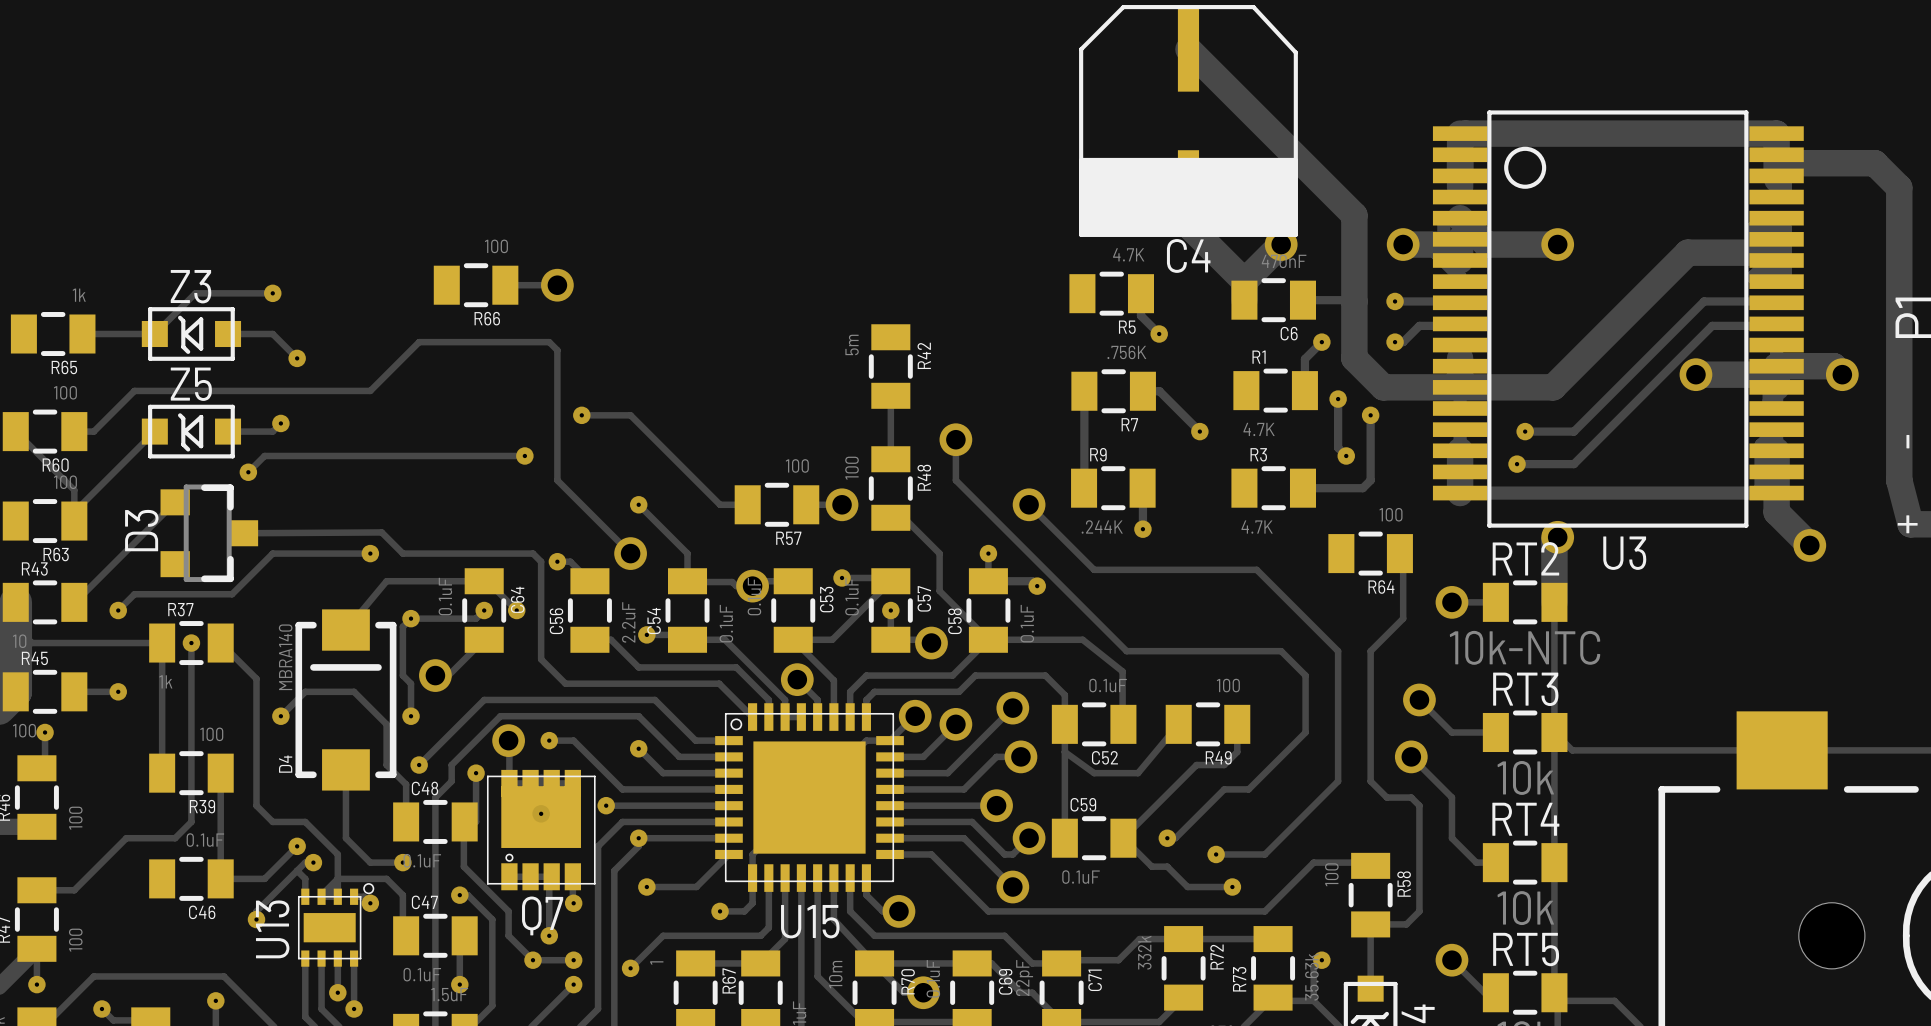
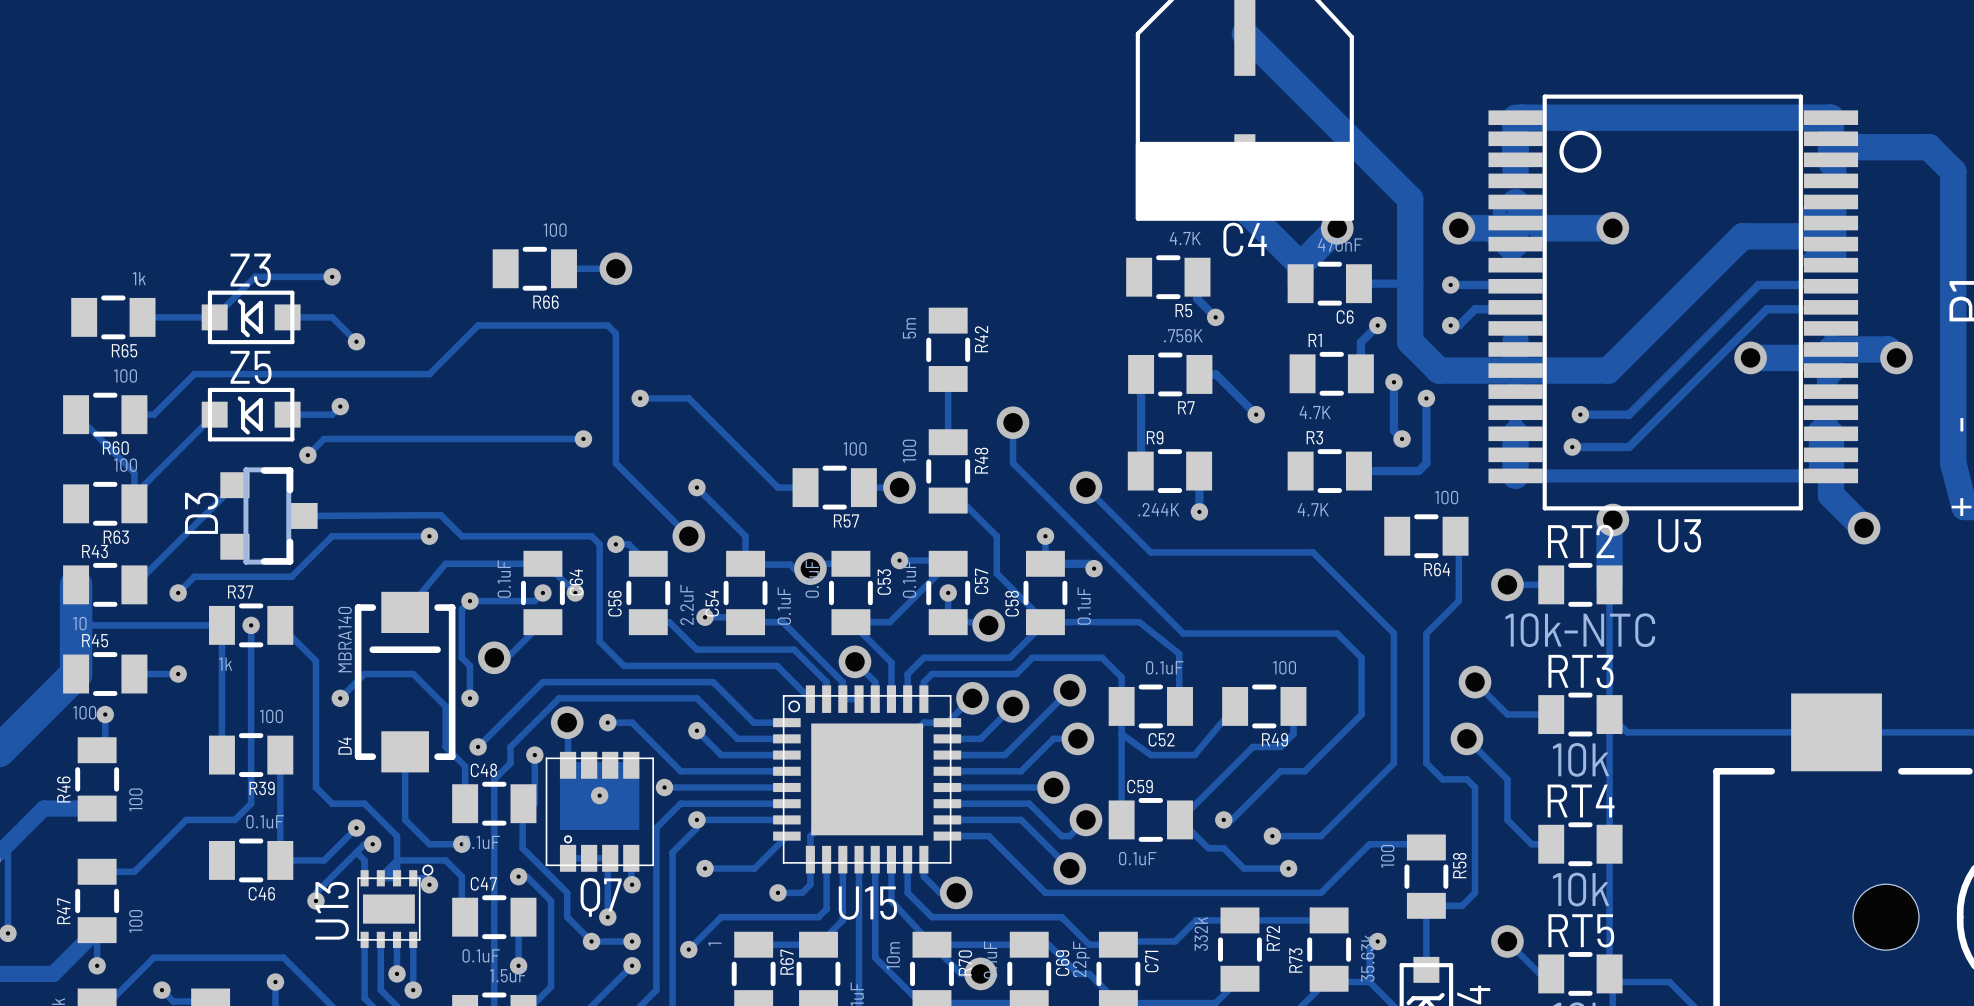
Q7 footprint: [486, 769, 596, 891] -> [545, 751, 654, 872]

